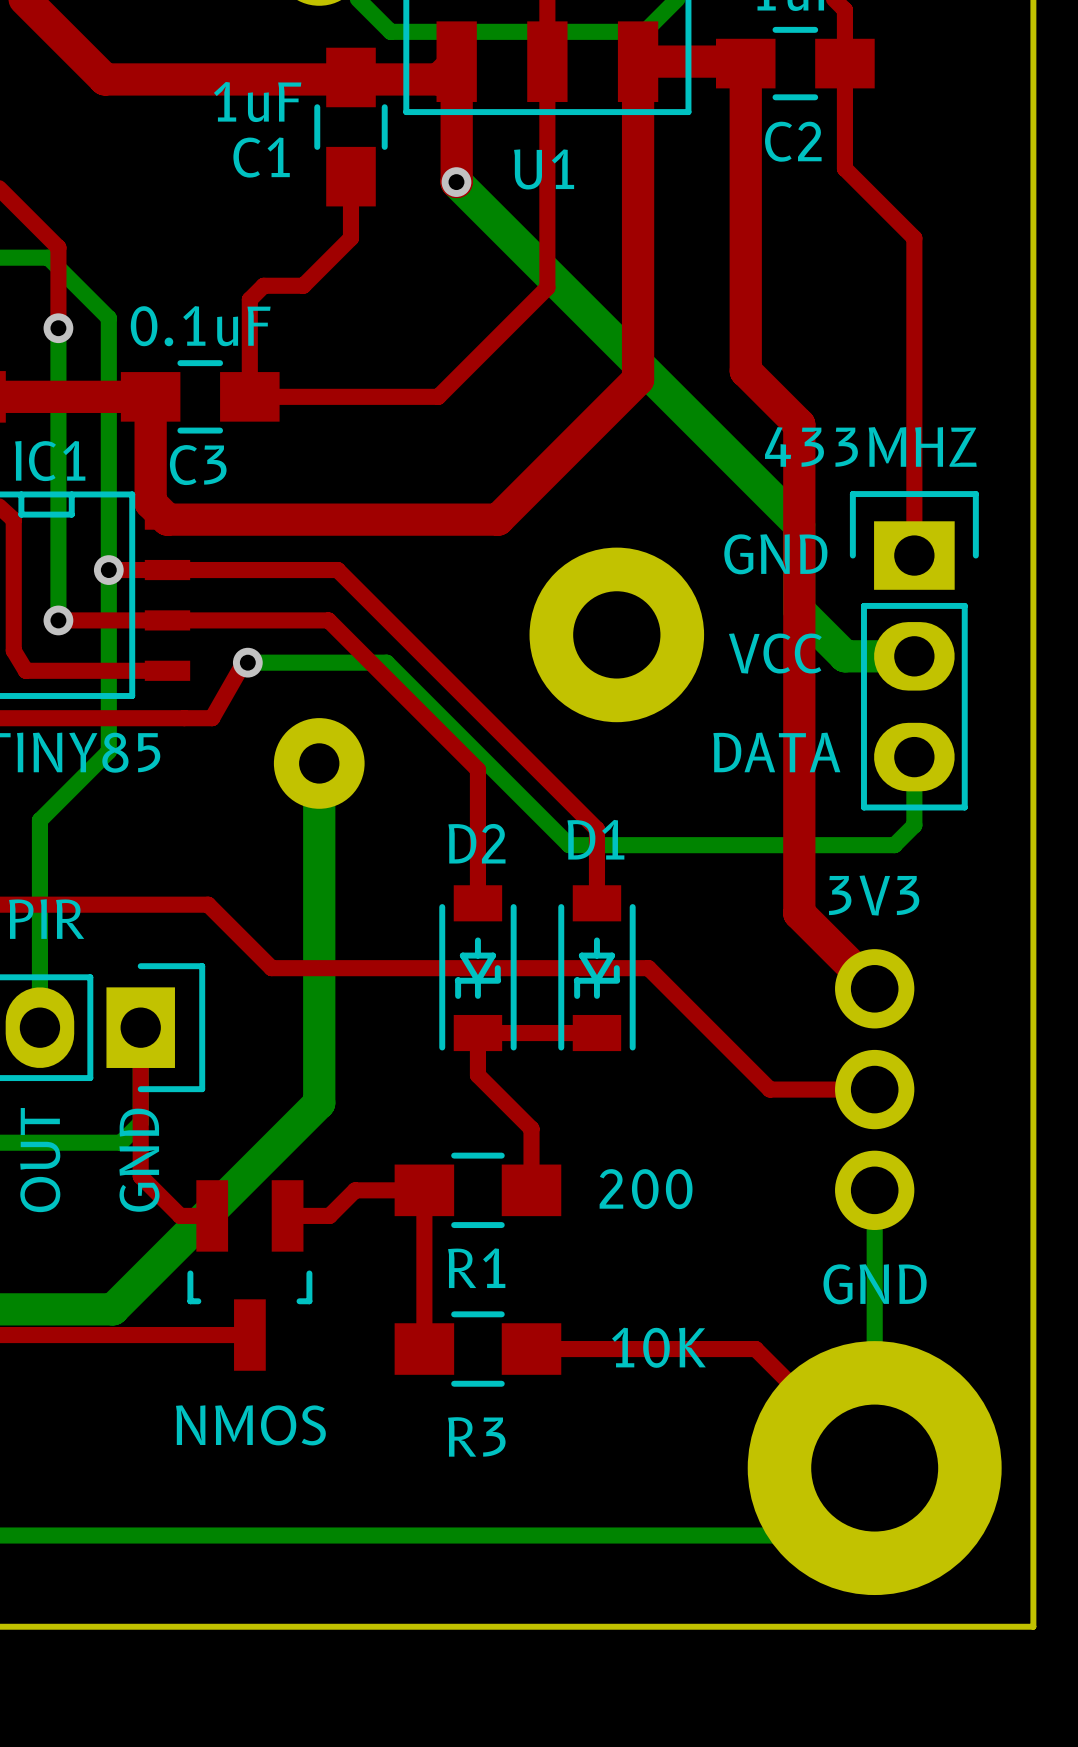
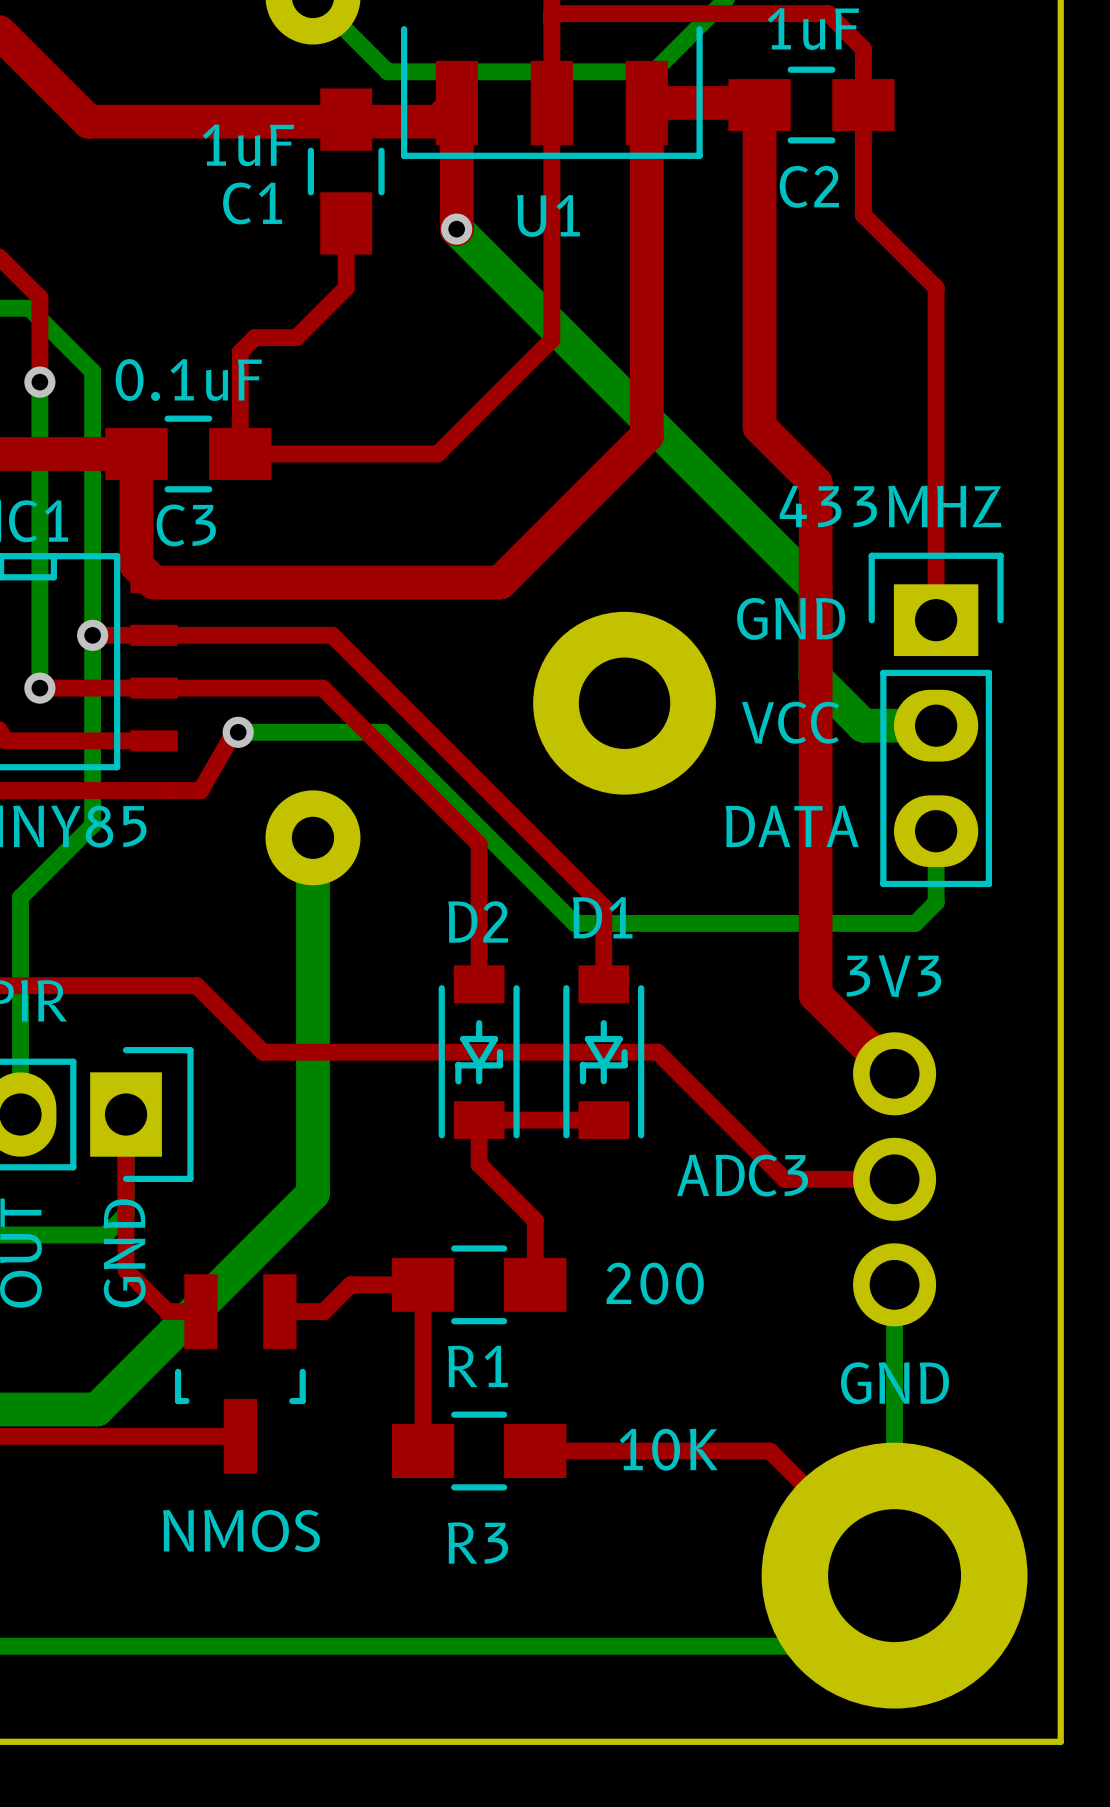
text: none -> ADC3 (742, 1175)

